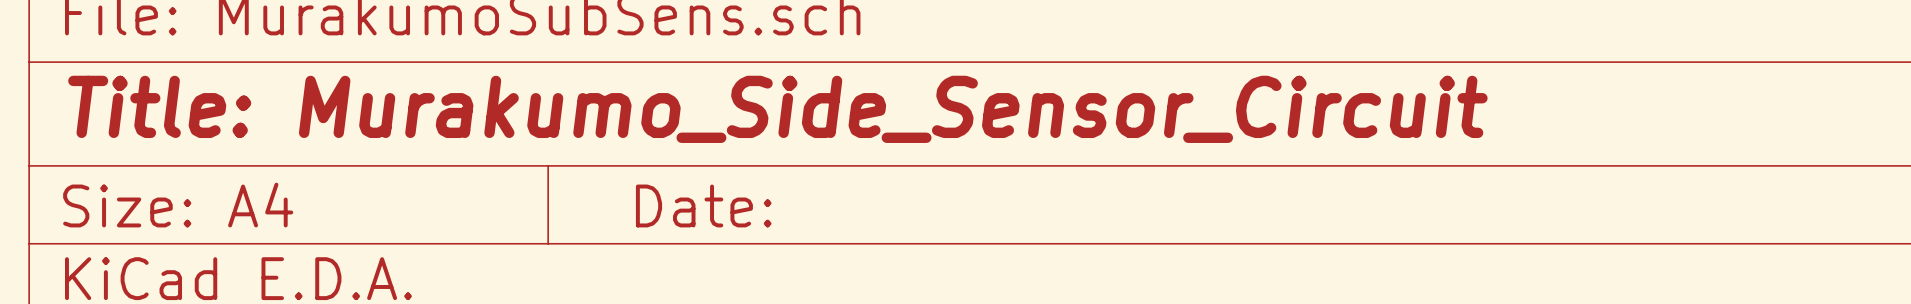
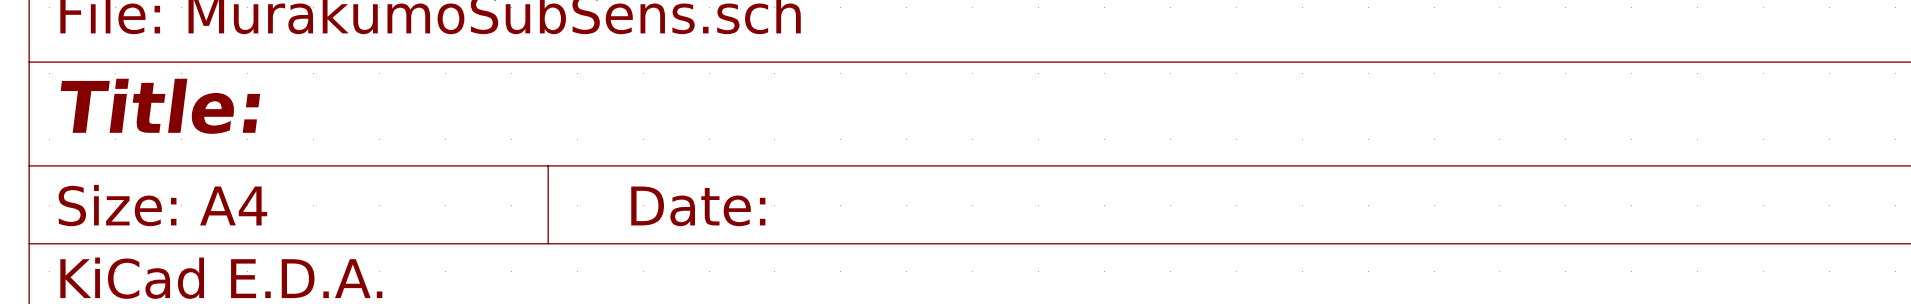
title block: Title: Murakumo_Side_Sensor_Circuit (777, 109) -> Title: (160, 106)

